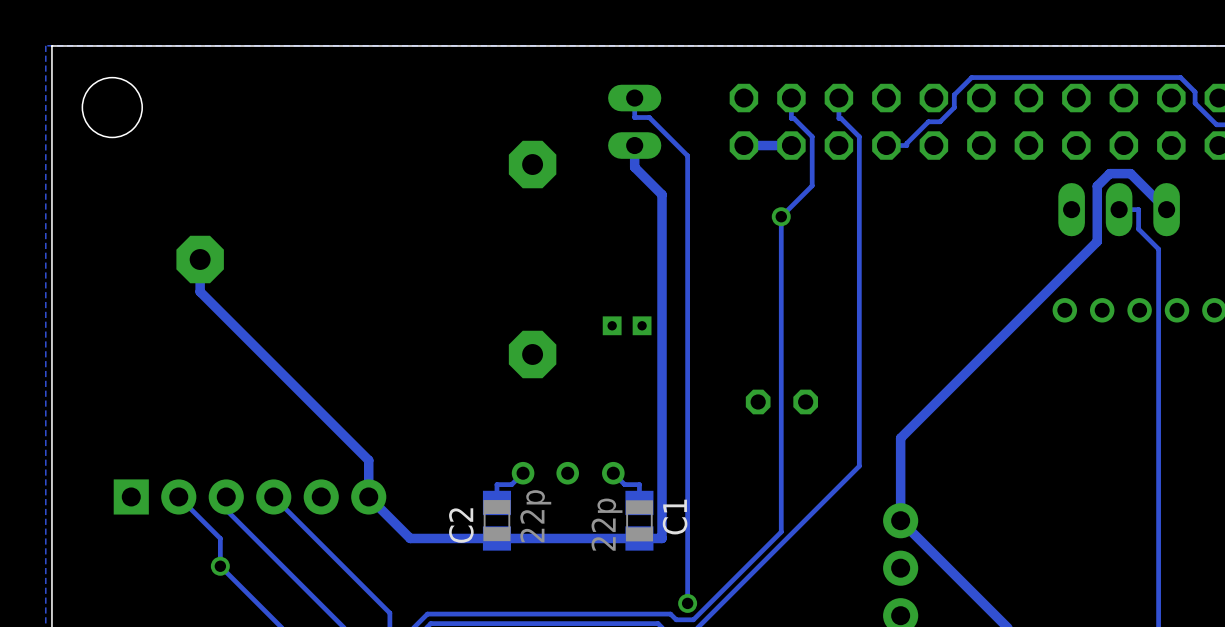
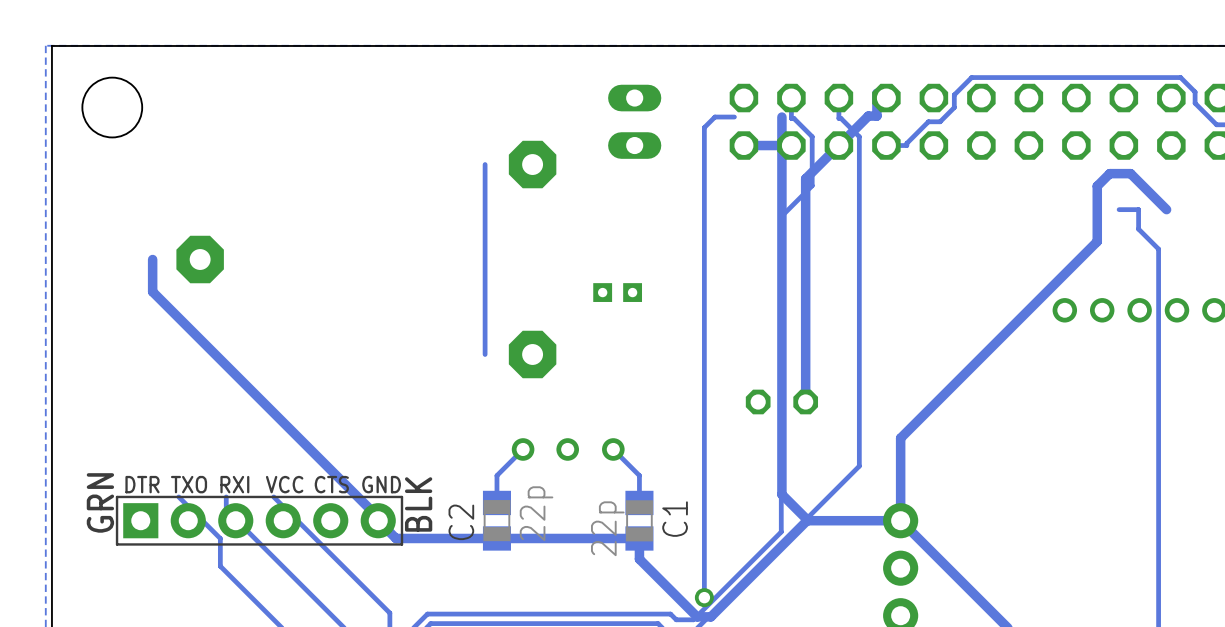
track: none -> (876, 93) (876, 116) (868, 116) (805, 178) (805, 401)
track: (634, 98) (634, 117) (649, 117) (687, 155) (687, 603) -> none
track: none -> (734, 117) (714, 117) (704, 127) (704, 597)
track: none -> (781, 117) (781, 494) (808, 520) (900, 520)
track: (634, 145) (634, 167) (662, 194) (662, 538) (639, 538) -> (807, 520) (710, 616) (697, 616) (639, 559) (639, 538)
track: none -> (485, 164) (485, 354)
part: (1119, 209) -> none
via: (781, 216) -> none
track: (200, 259) (200, 291) (368, 460) (368, 496) (410, 538) -> (152, 259) (152, 291) (378, 517) (378, 520) (396, 538) (410, 538)
part position: (627, 325) -> (617, 292)
track: (523, 473) (511, 484) (496, 484) -> (523, 449) (496, 475) (496, 484)
part position: (568, 473) -> (568, 449)
track: (613, 473) (624, 484) (639, 484) -> (613, 449) (639, 475) (639, 484)
part side: top (250, 496) -> bottom (259, 520)
via: (220, 566) -> none
via position: (687, 603) -> (704, 597)

